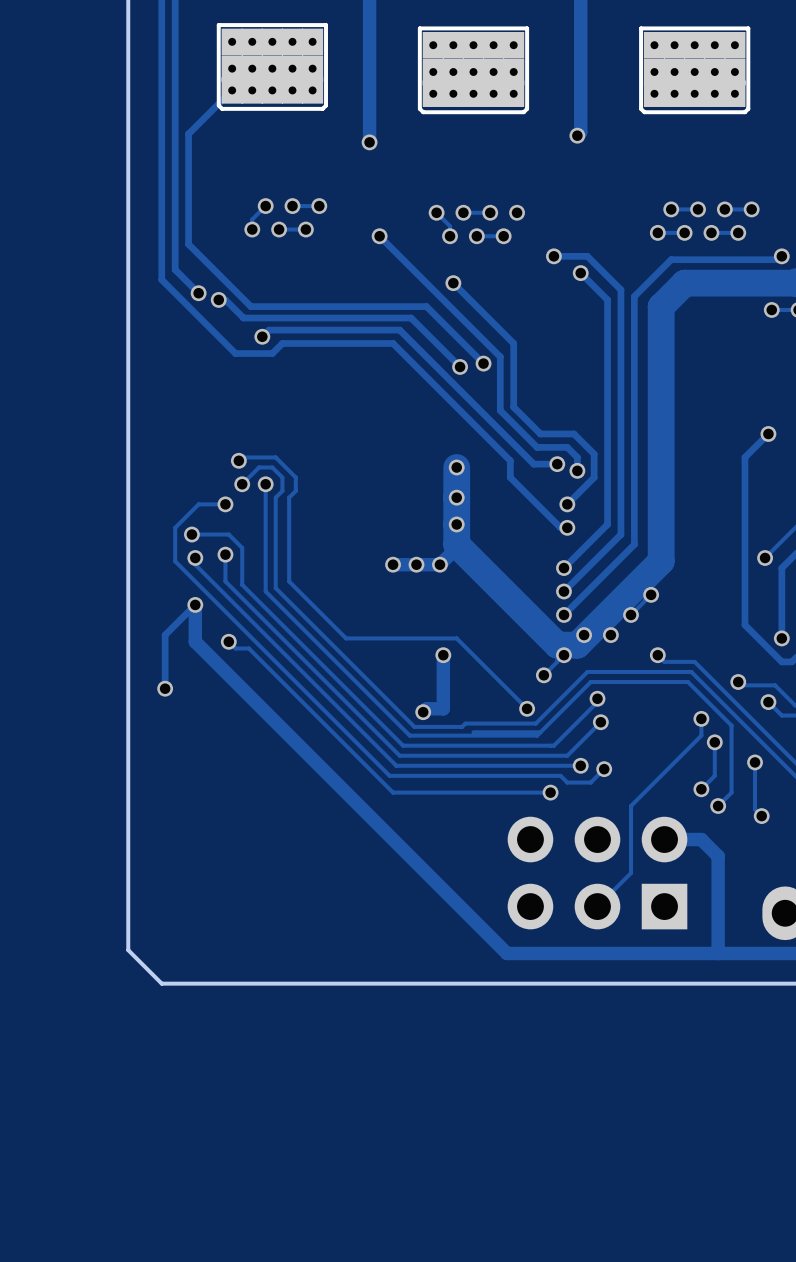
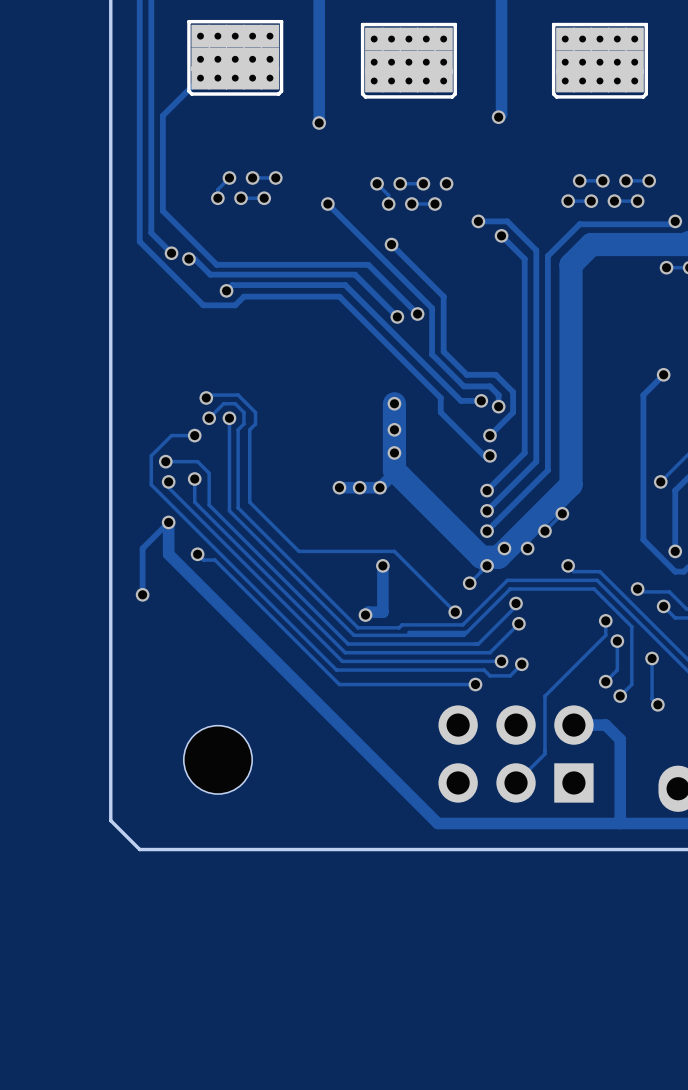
part: none -> (217, 759)

